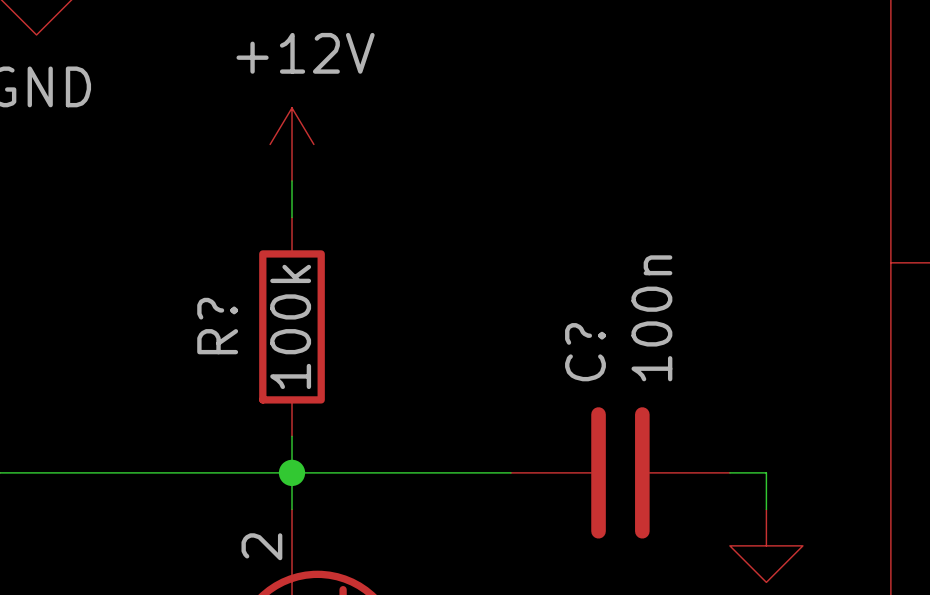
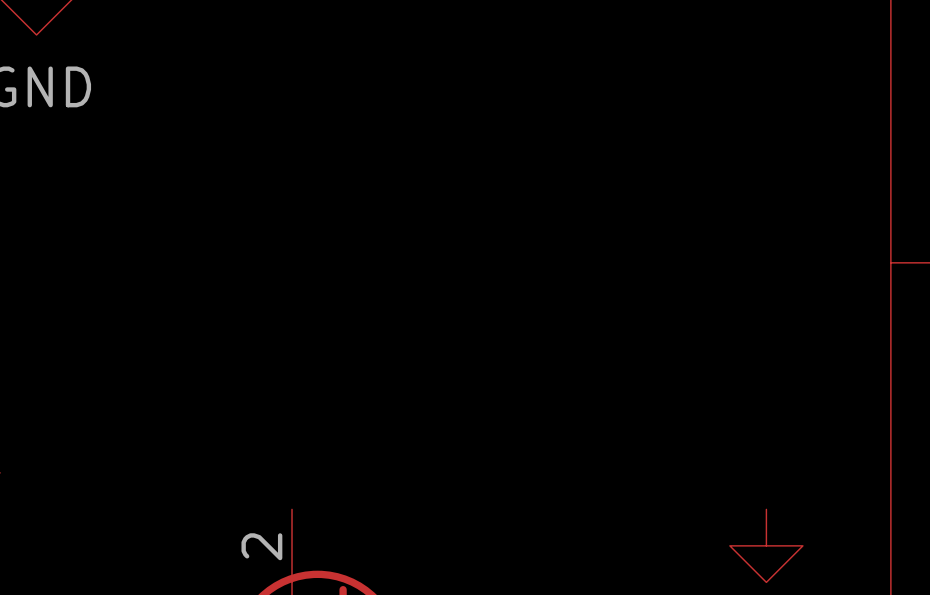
power symbol: +12V (292, 144) -> none
wire: (292, 180) (292, 217) -> none
R?: 100k (292, 326) -> none
wire: (292, 436) (292, 509) -> none
wire: (0, 472) (510, 472) -> none
junction: (292, 472) -> none
C?: 100n (620, 472) -> none
wire: (729, 472) (766, 472) (766, 509) -> none

